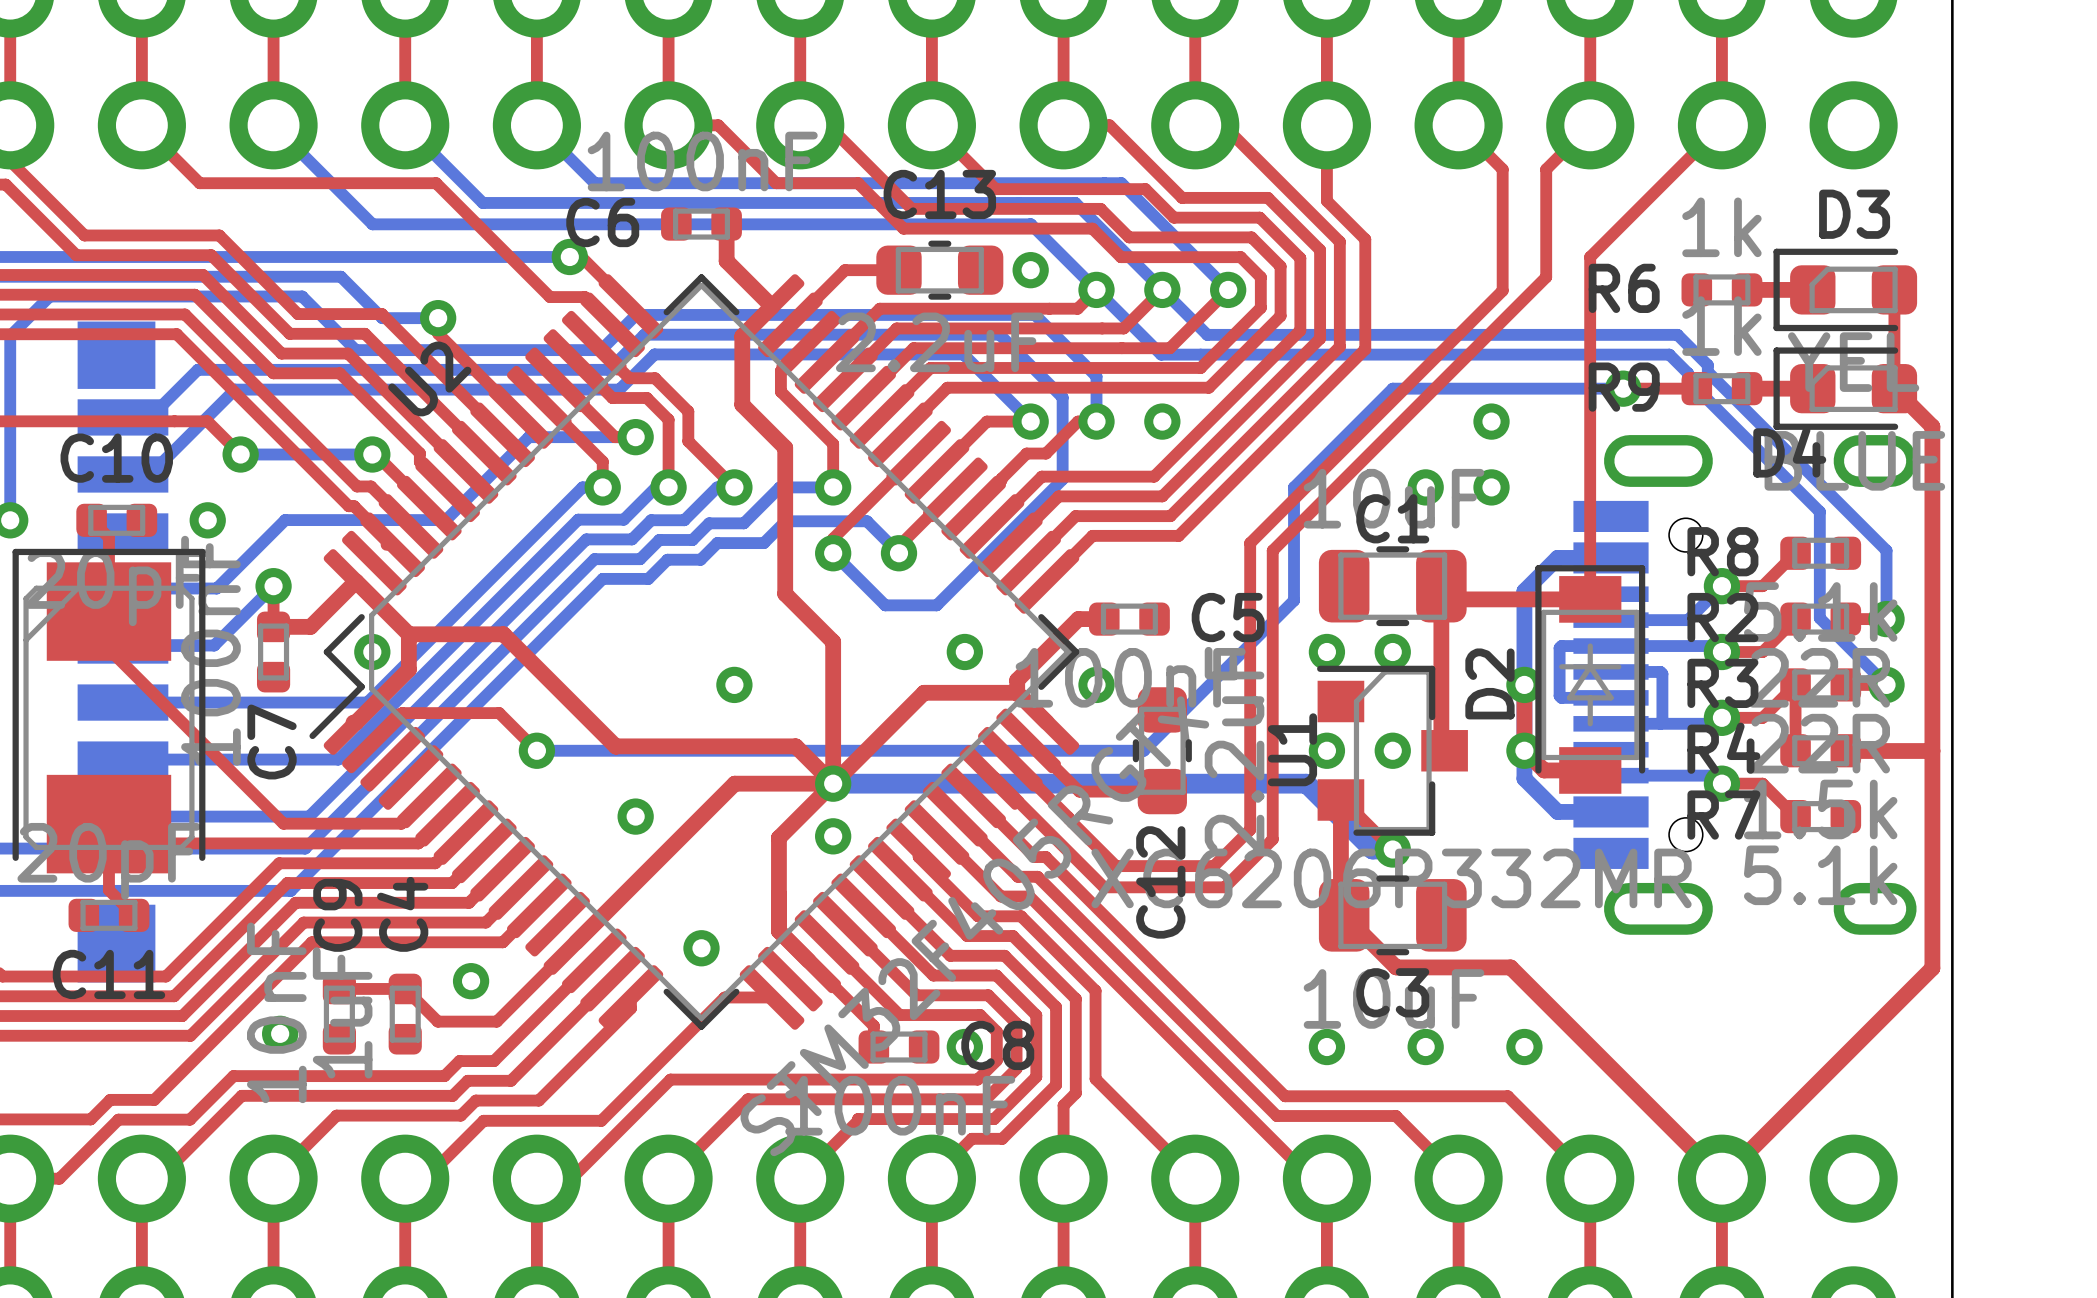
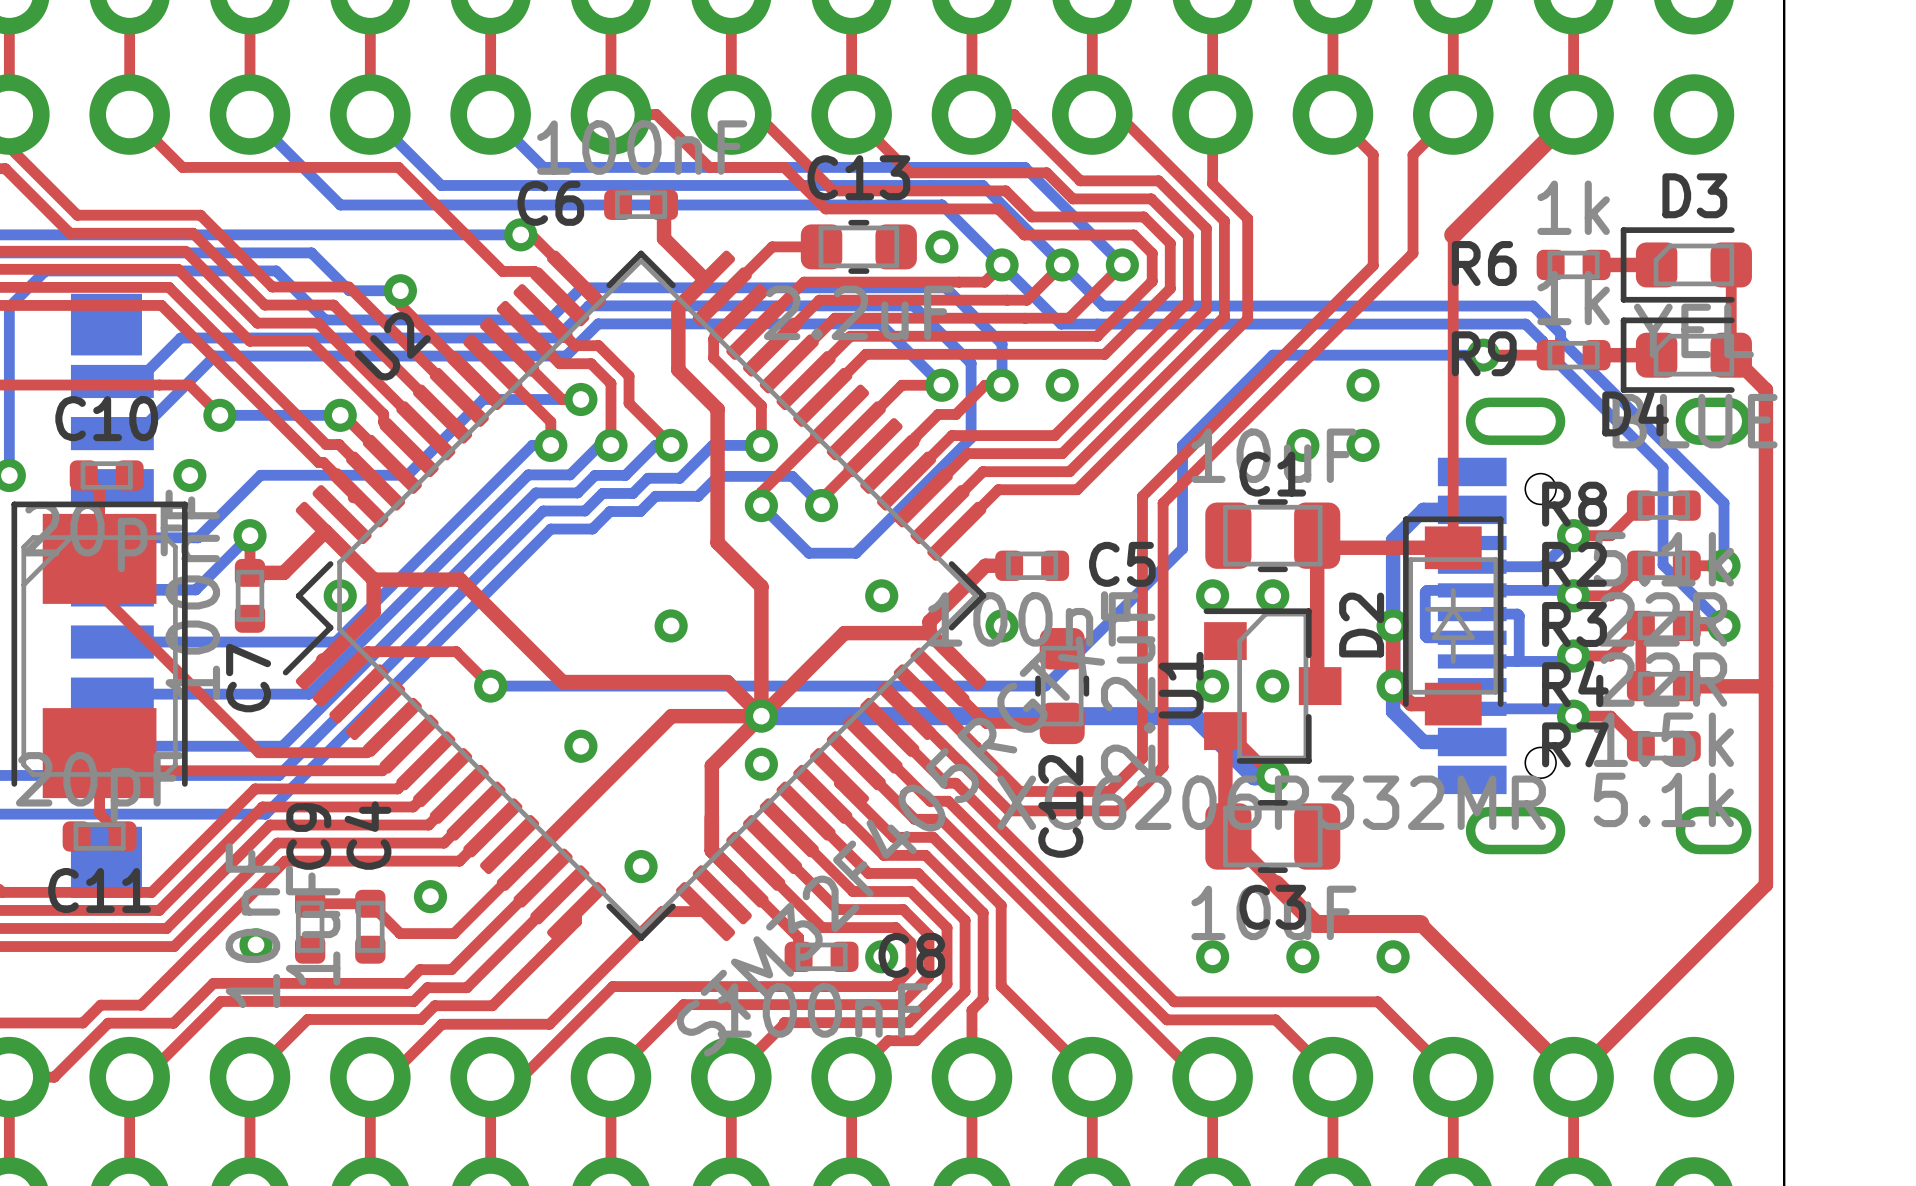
top track width: thin (1721, 125) (1590, 257) -> thick (1573, 114) (1453, 234)
top track: (1396, 967) (1510, 967) (1554, 1011) -> (1275, 884) (1315, 923) (1420, 923)

